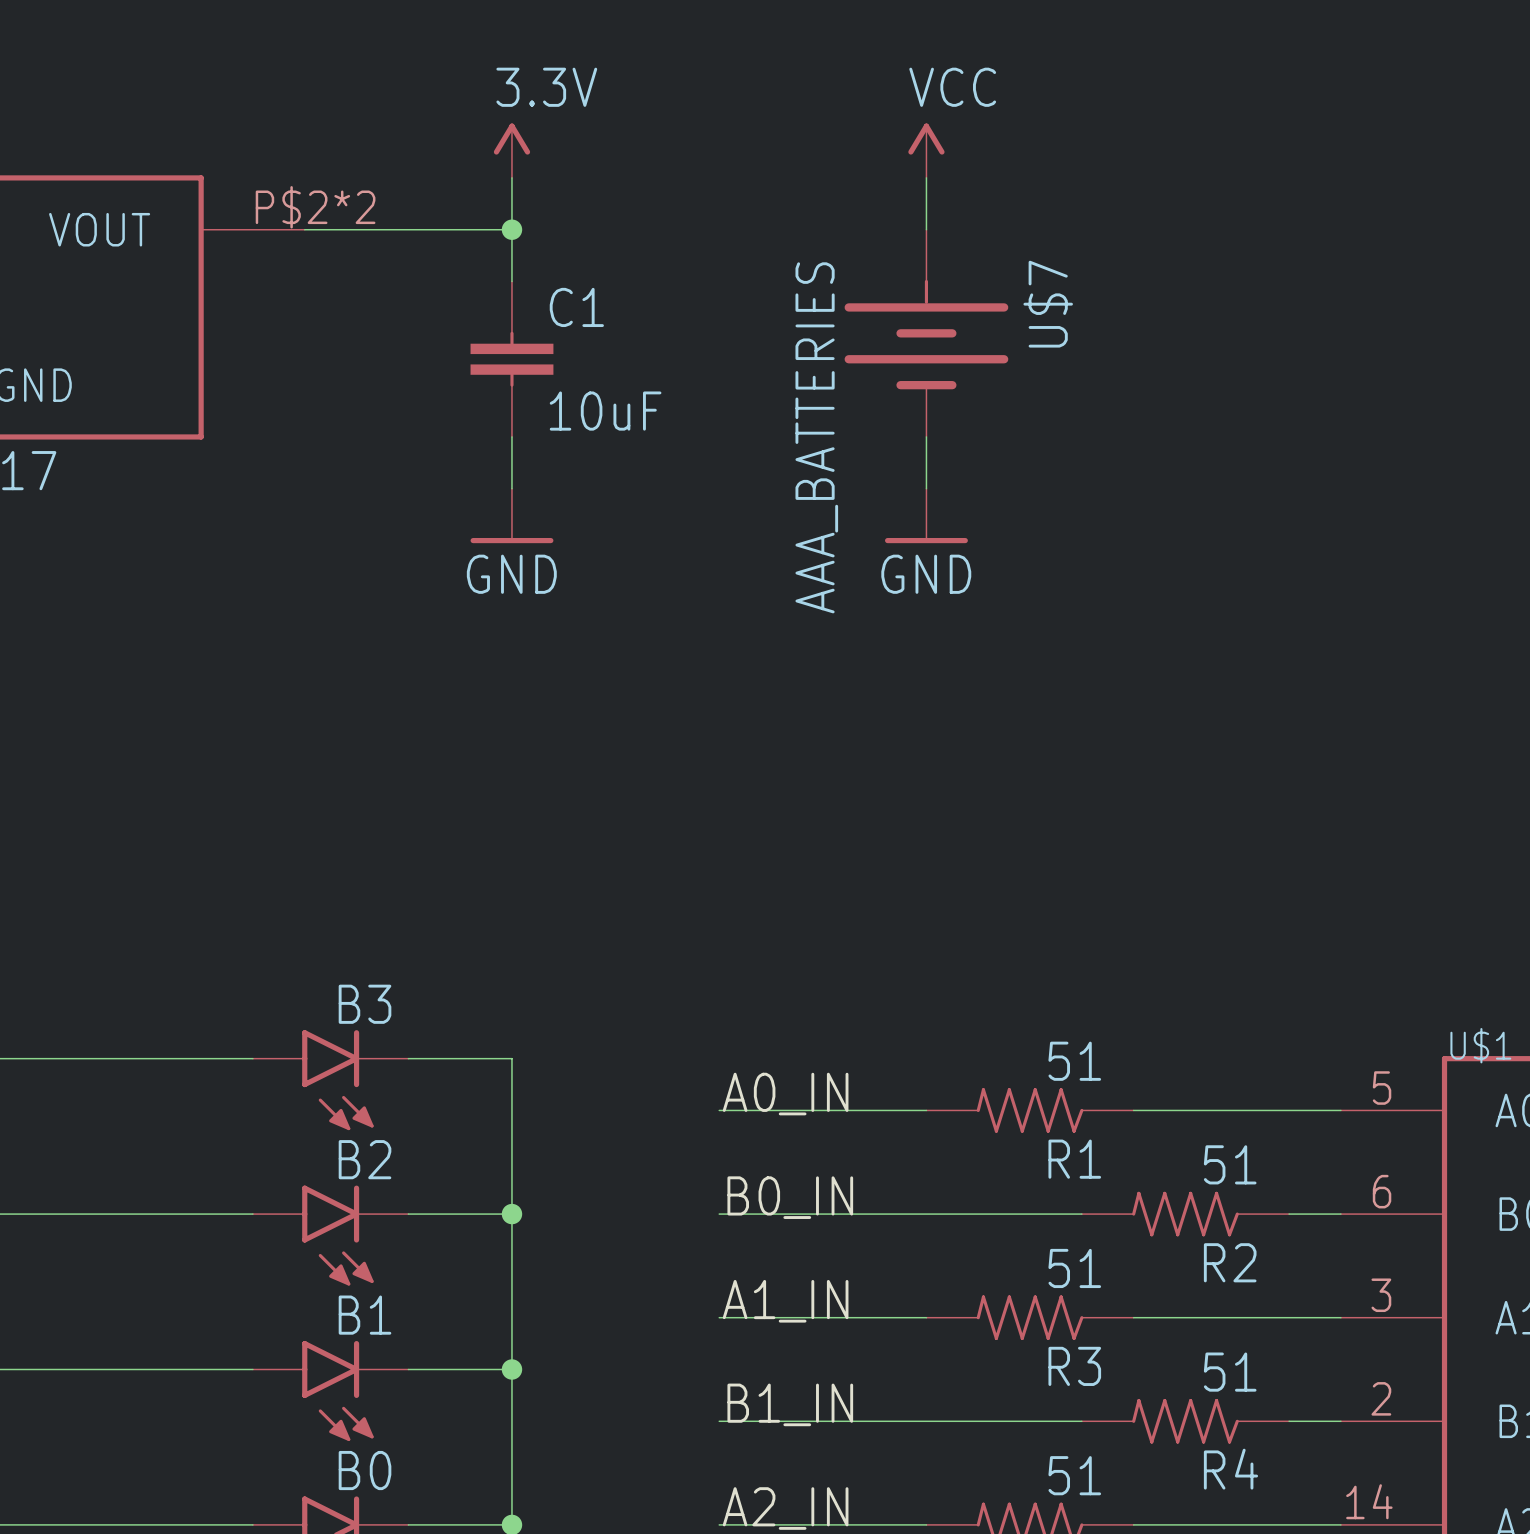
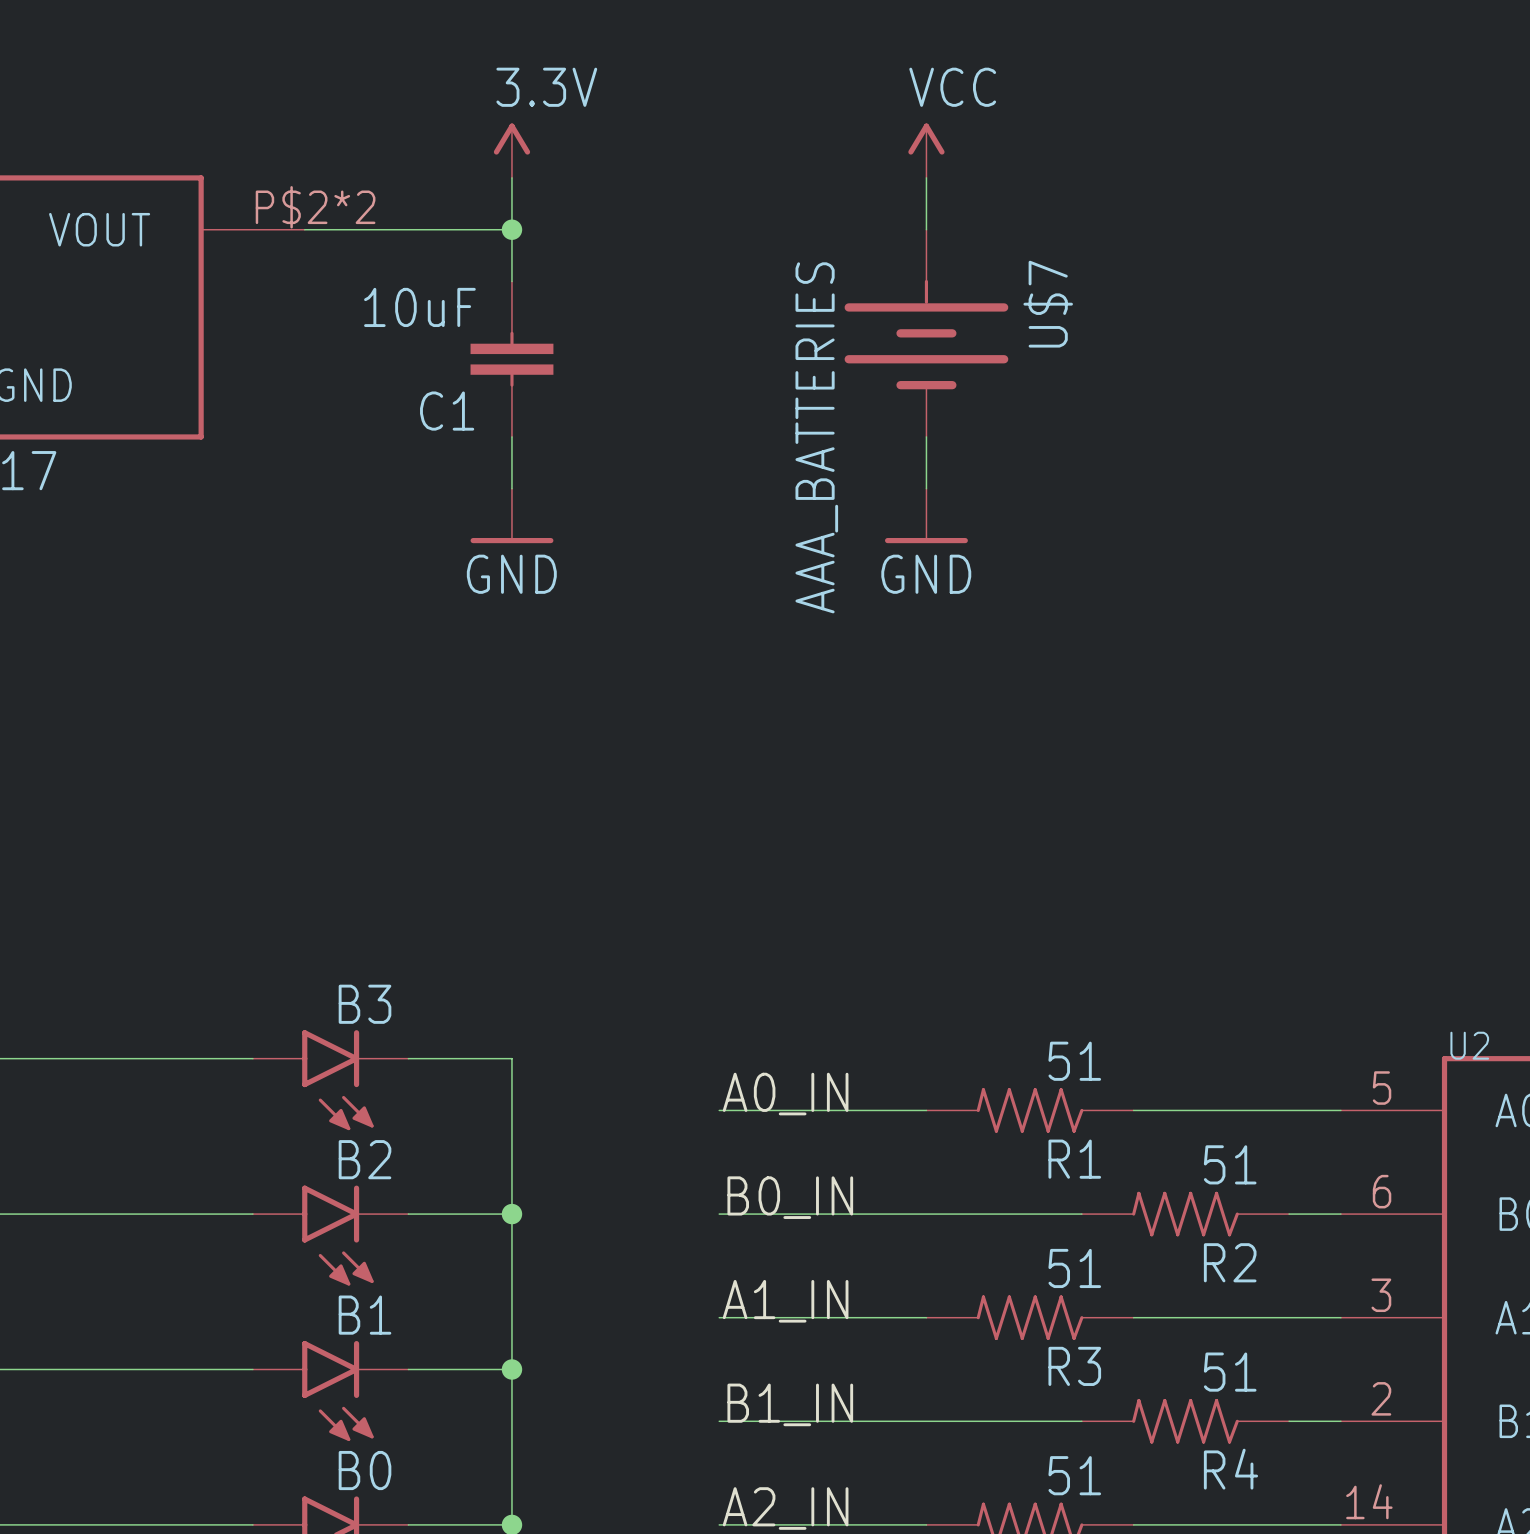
C1 name position: C1 (576, 307) -> C1 (447, 411)
C1 value position: 10uF (605, 411) -> 10uF (419, 307)
U$1 name: U$1 (1480, 1045) -> U2 (1469, 1045)

